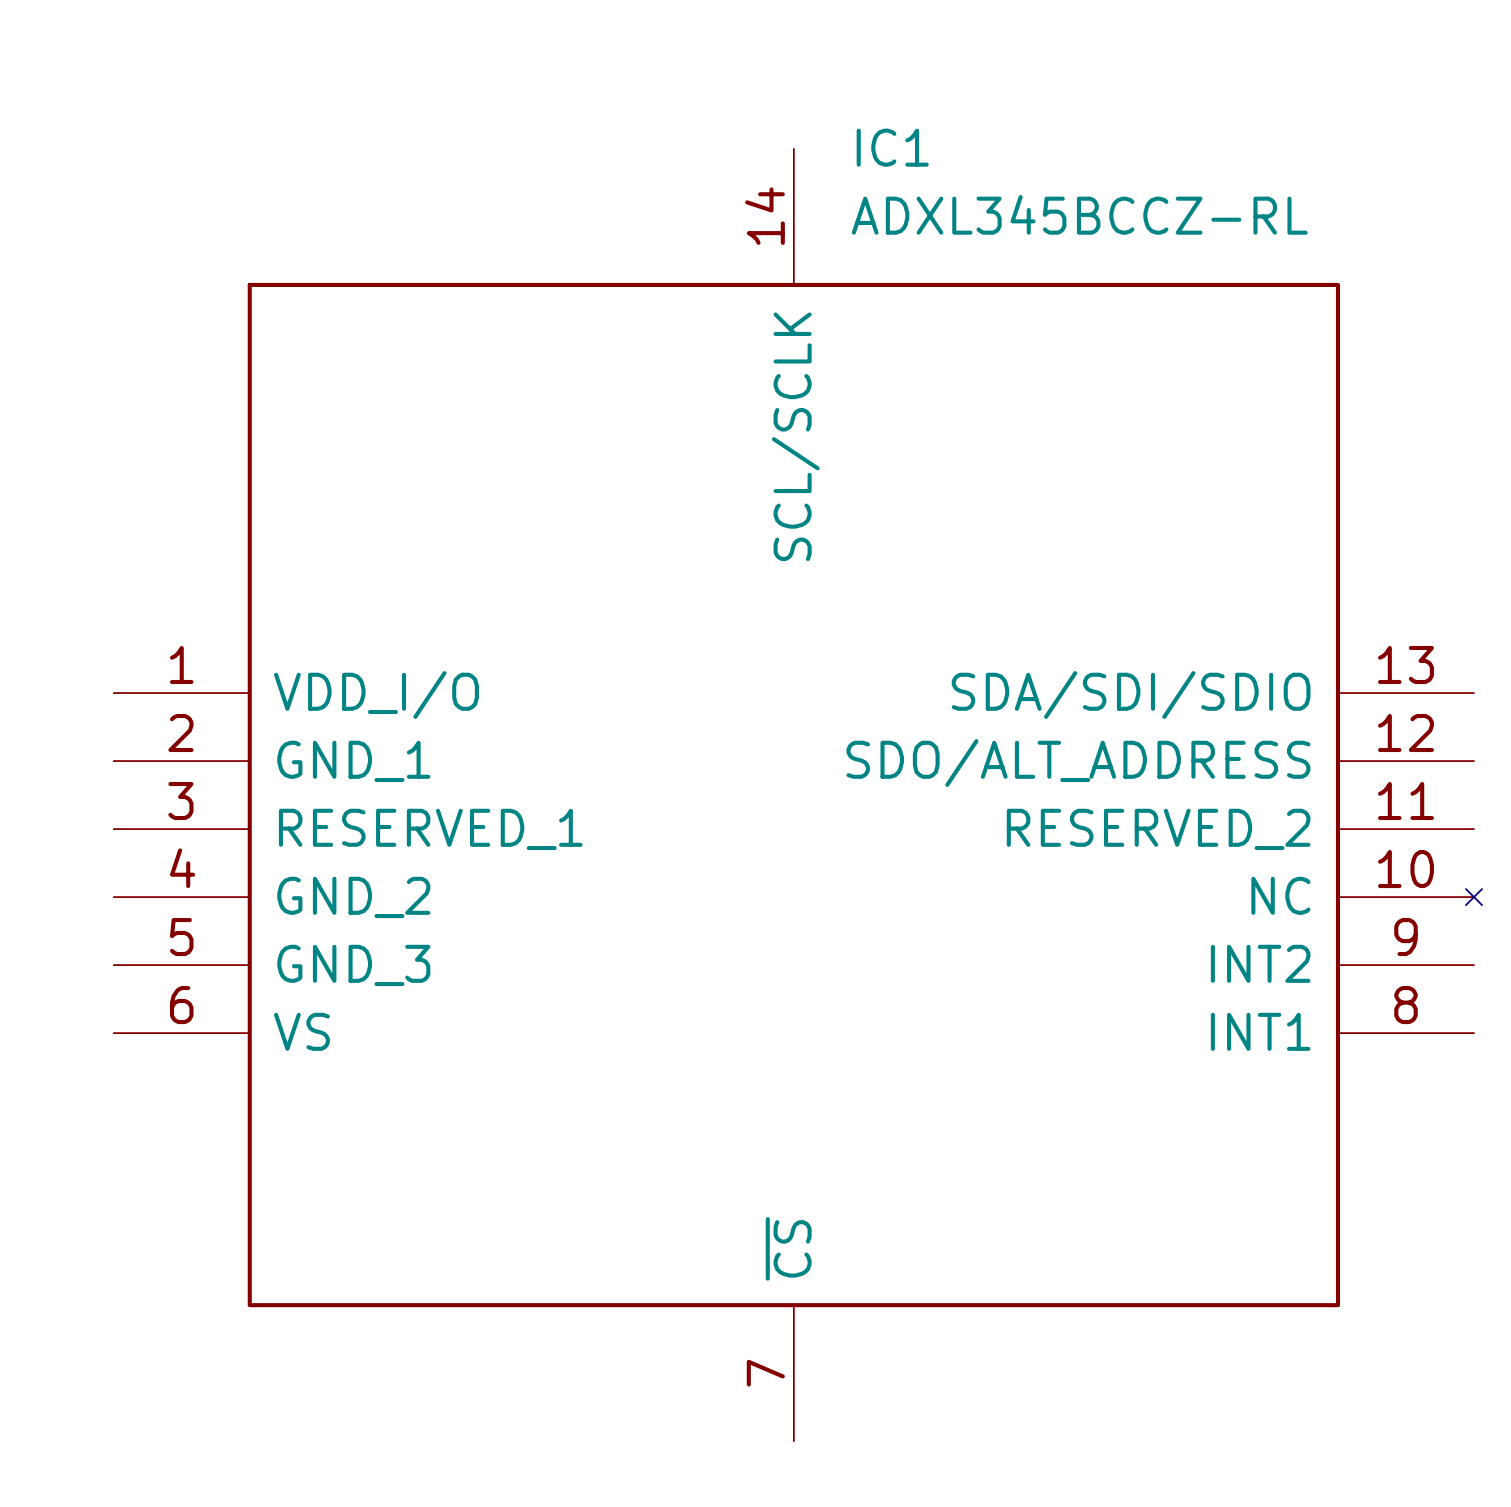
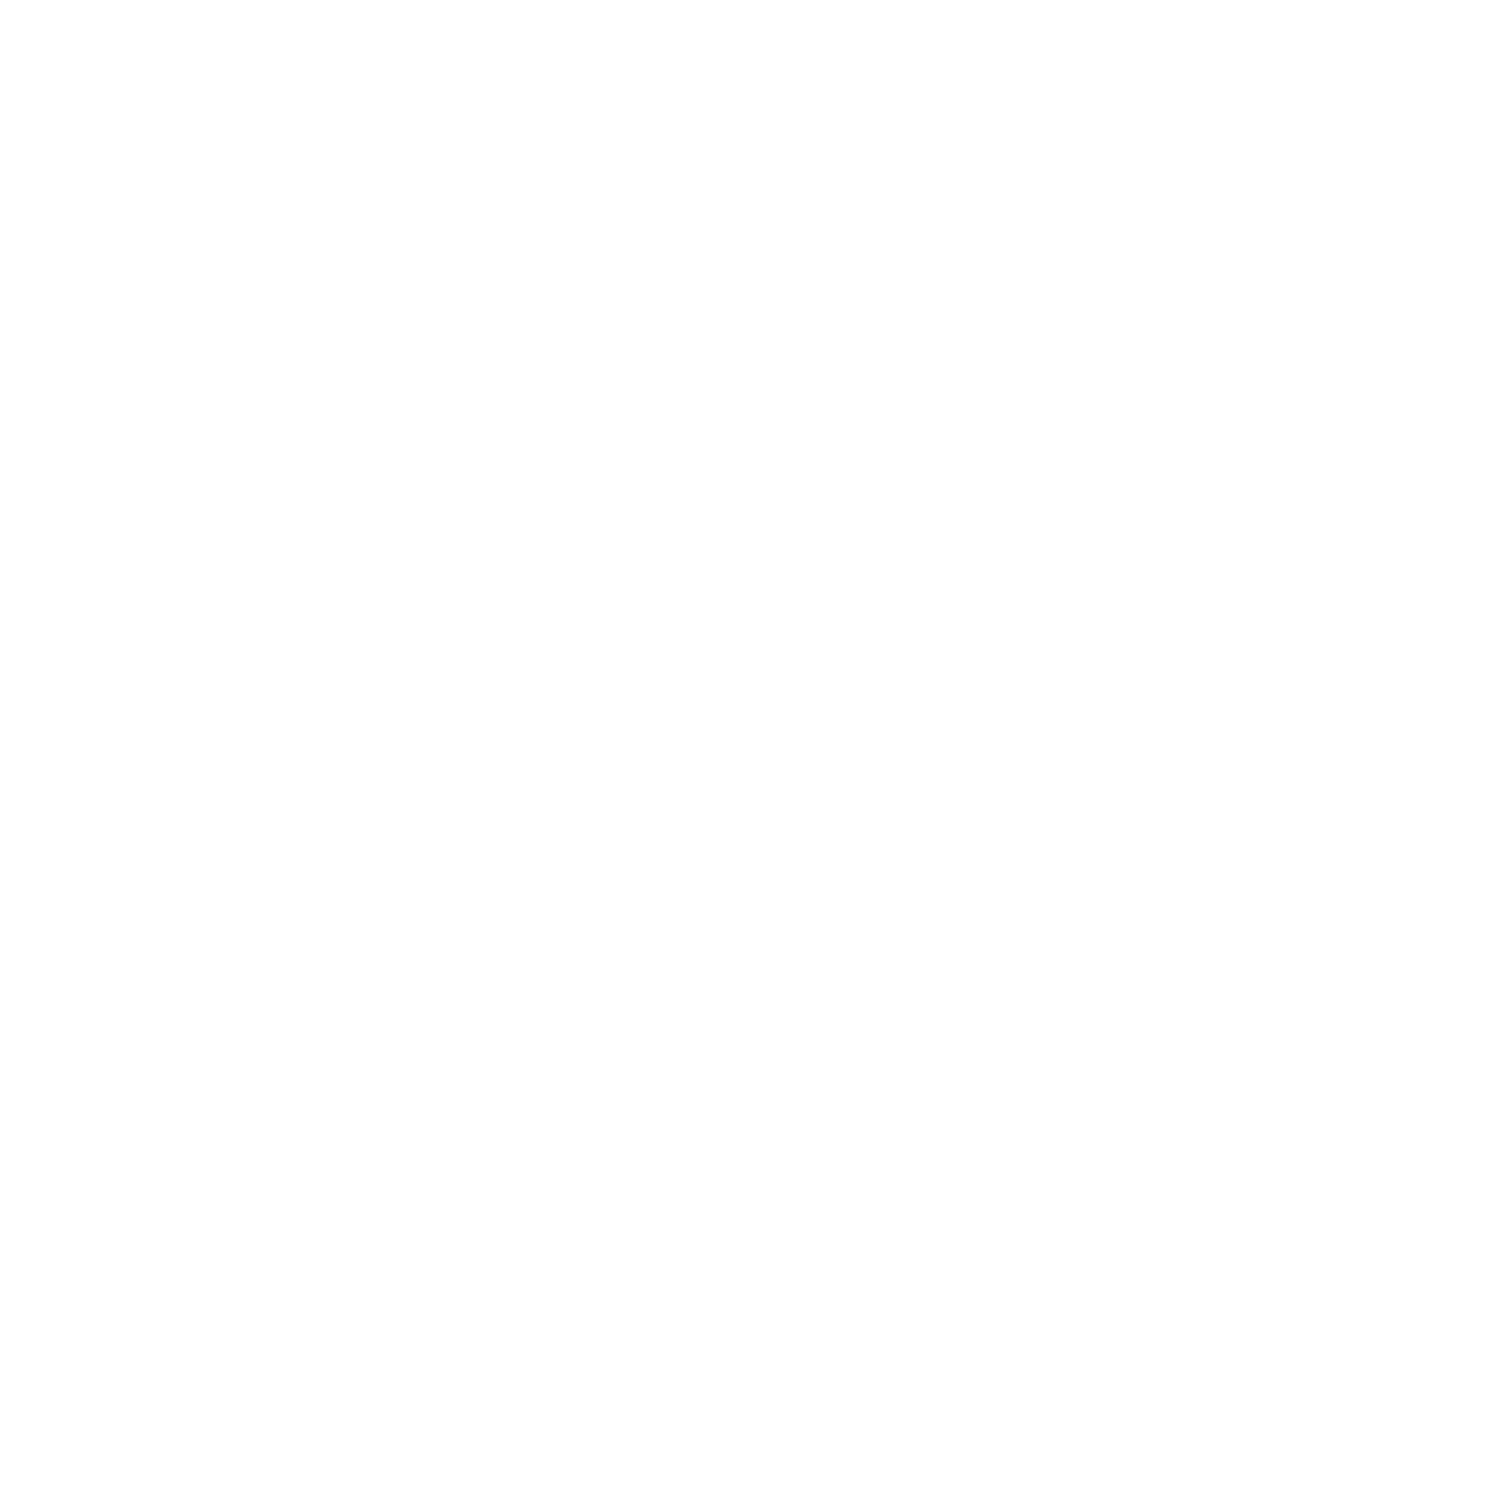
IC1: ADXL345BCCZ-RL (797, 795) -> none

